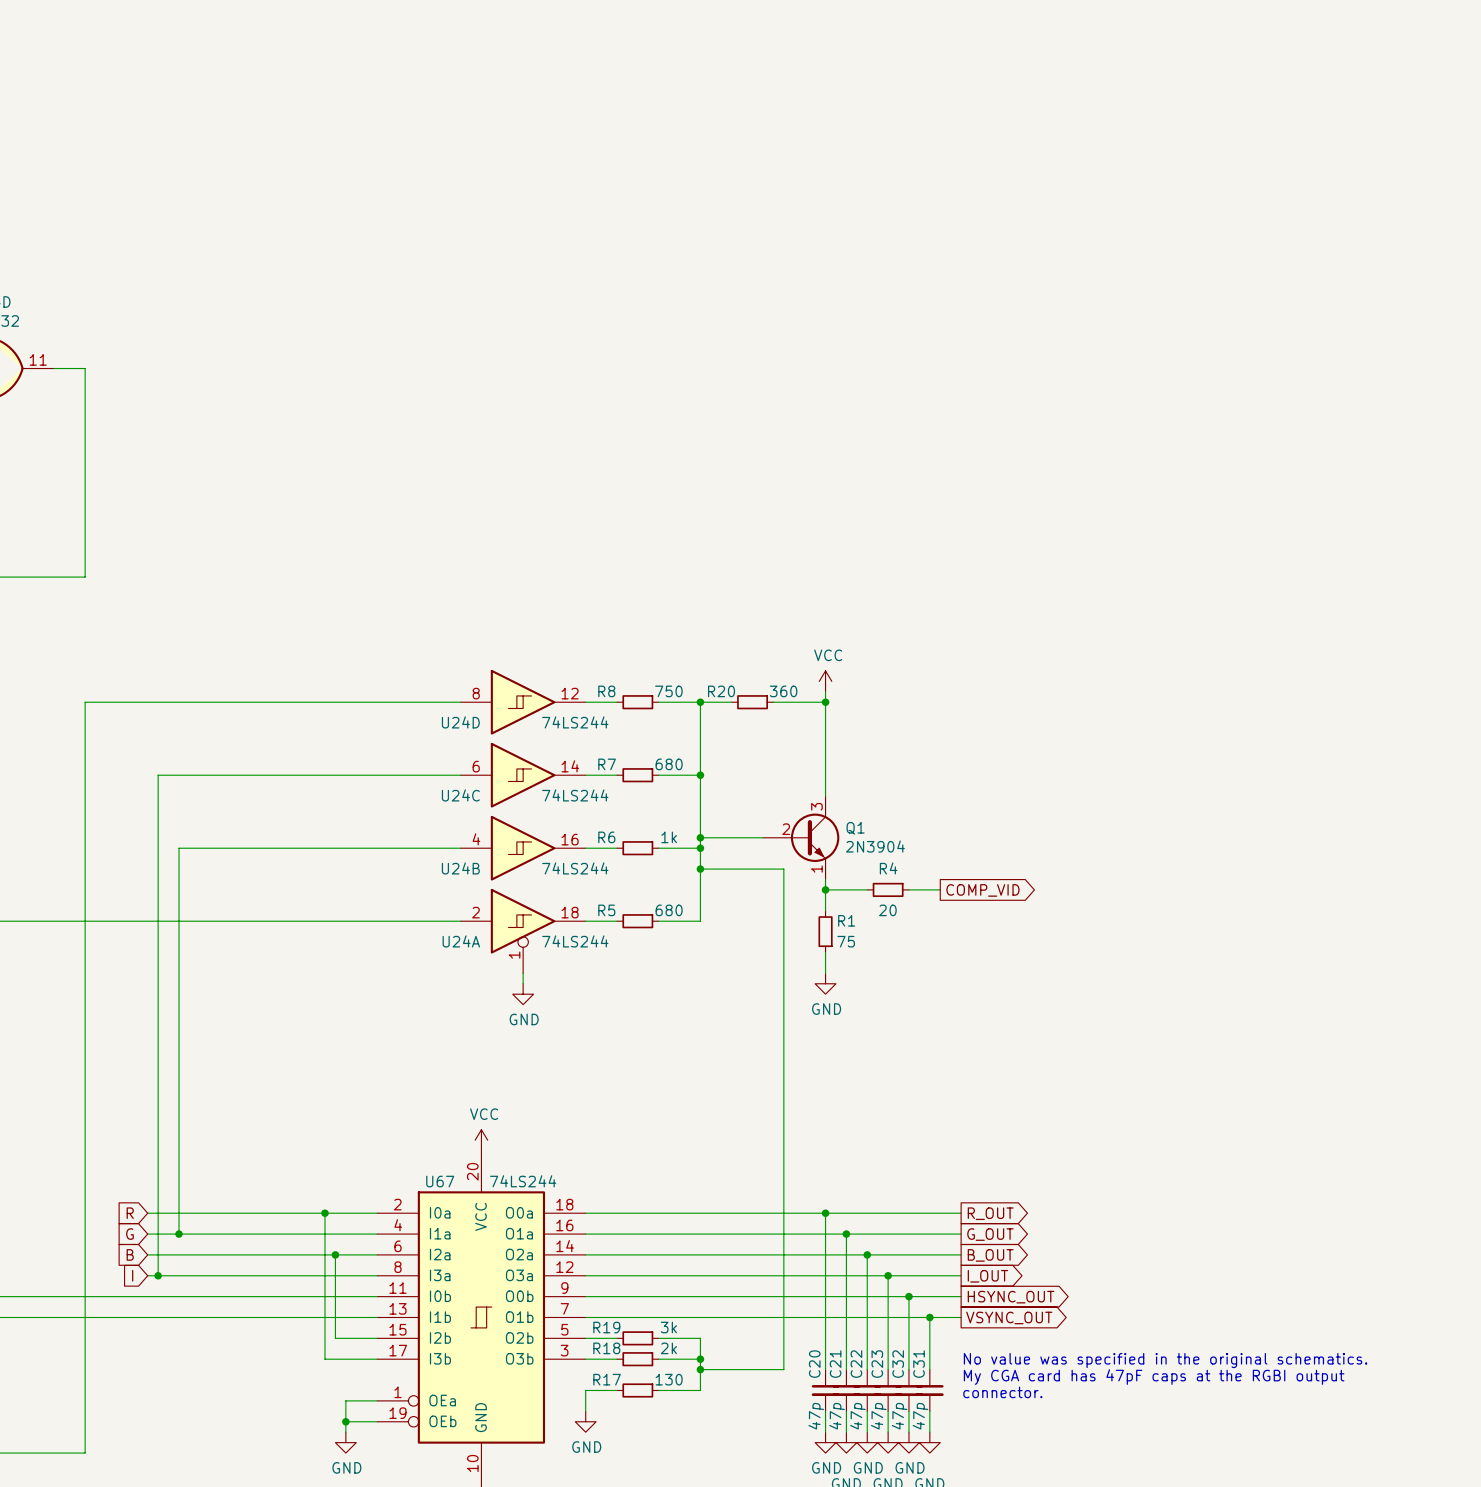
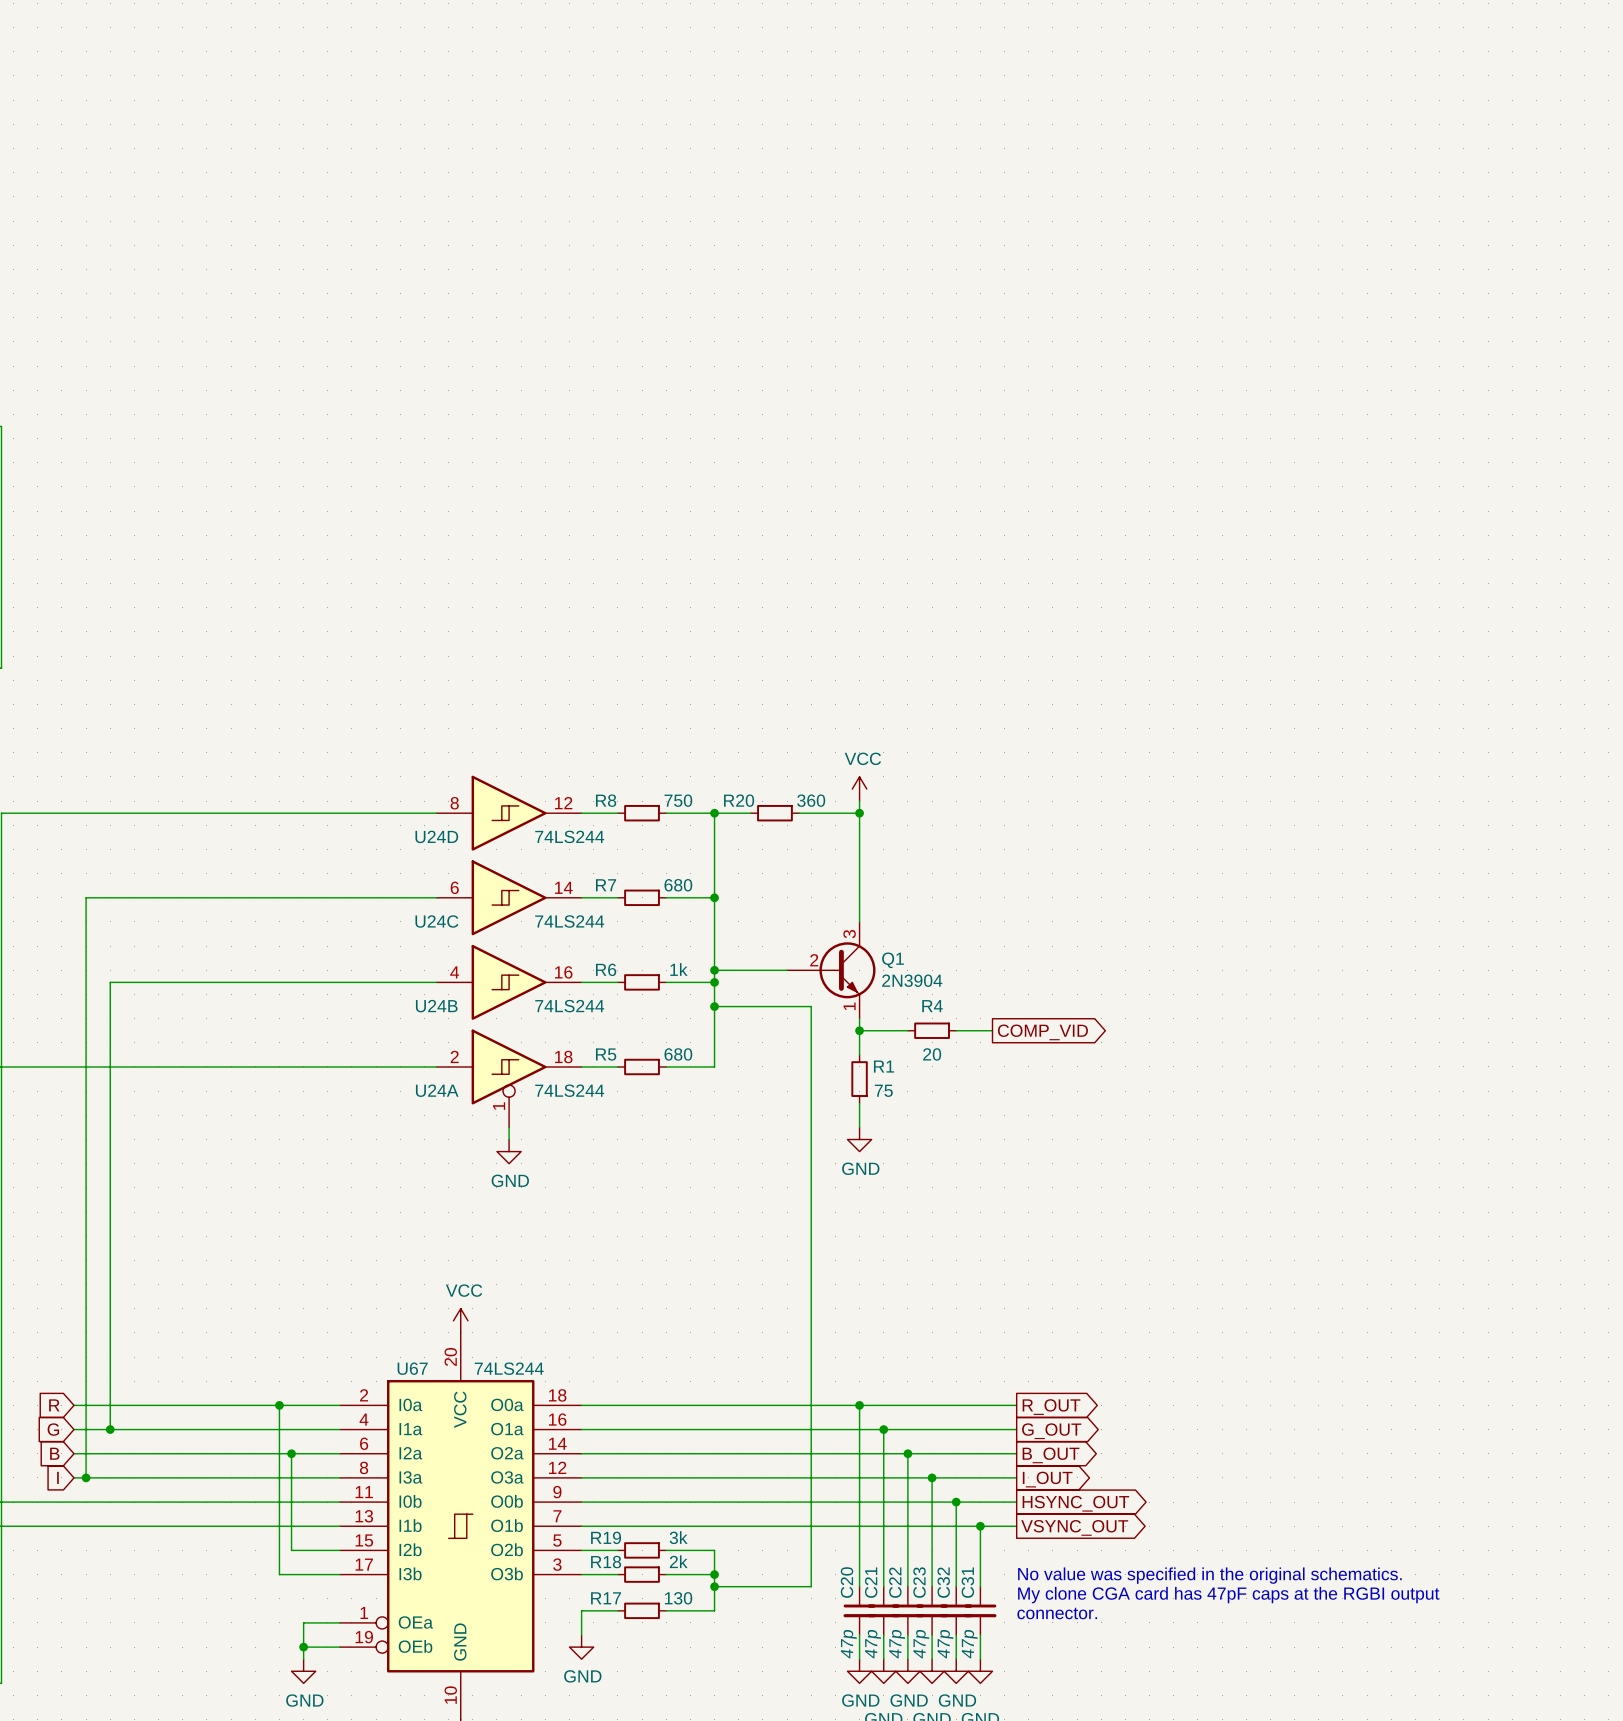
text: My CGA card has 47pF caps at the RGBI output (1154, 1377) -> My clone CGA card has 47pF caps at the RGBI output (1228, 1595)

